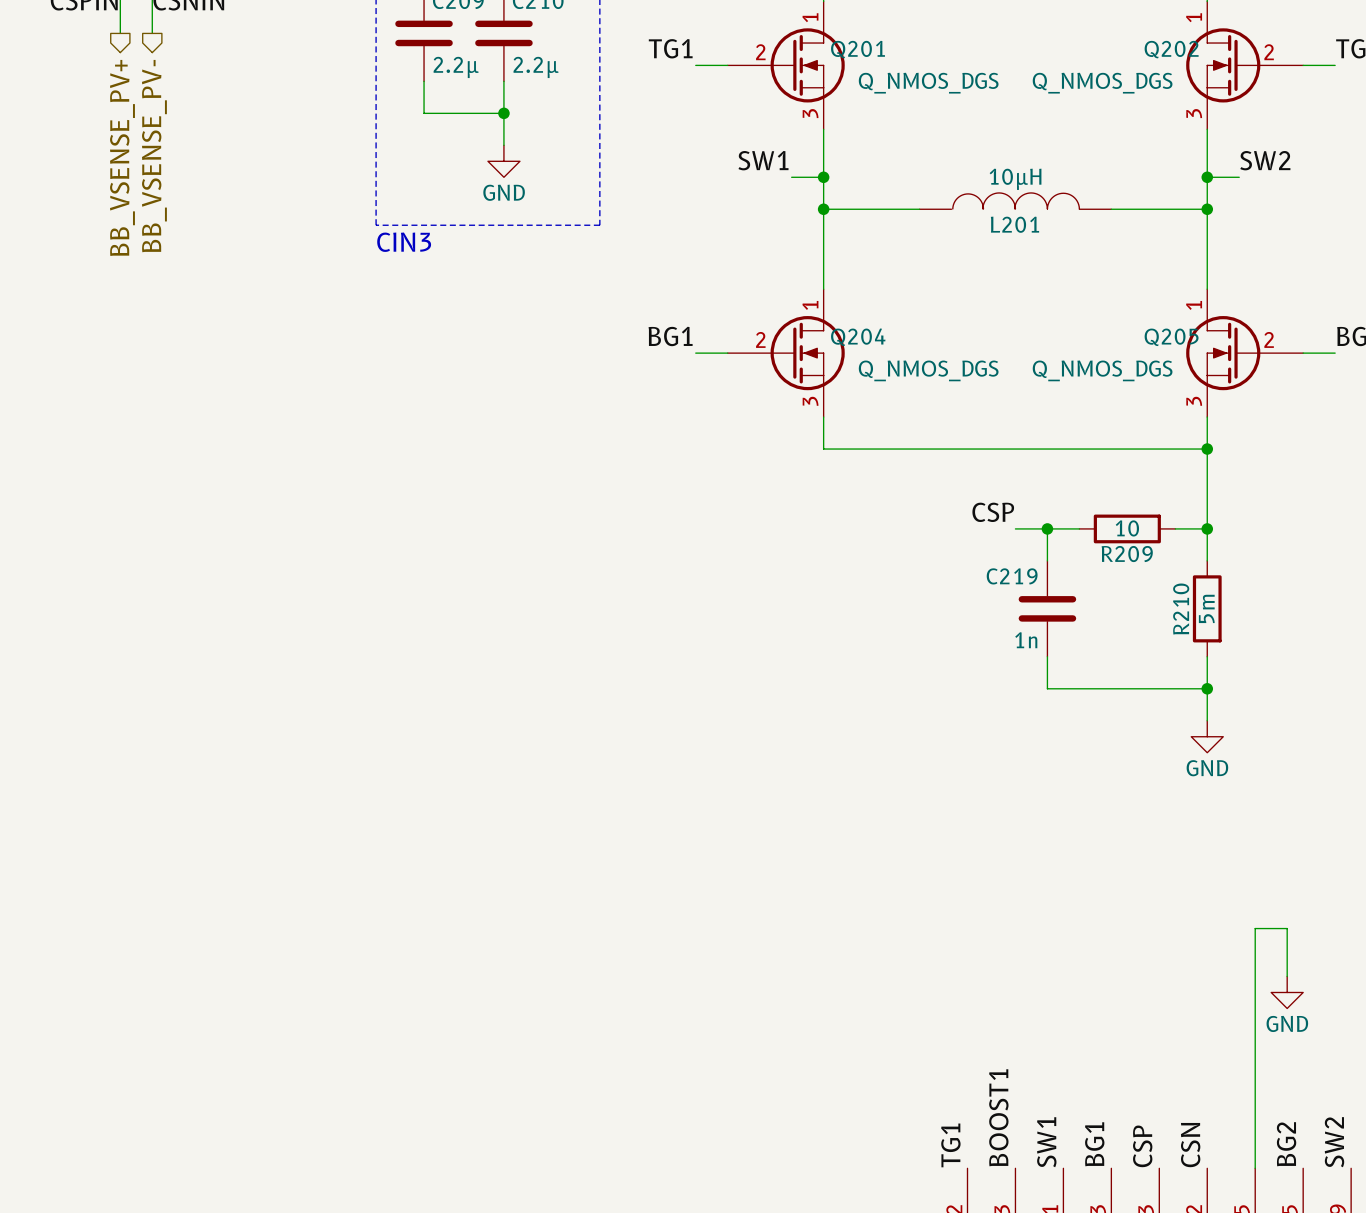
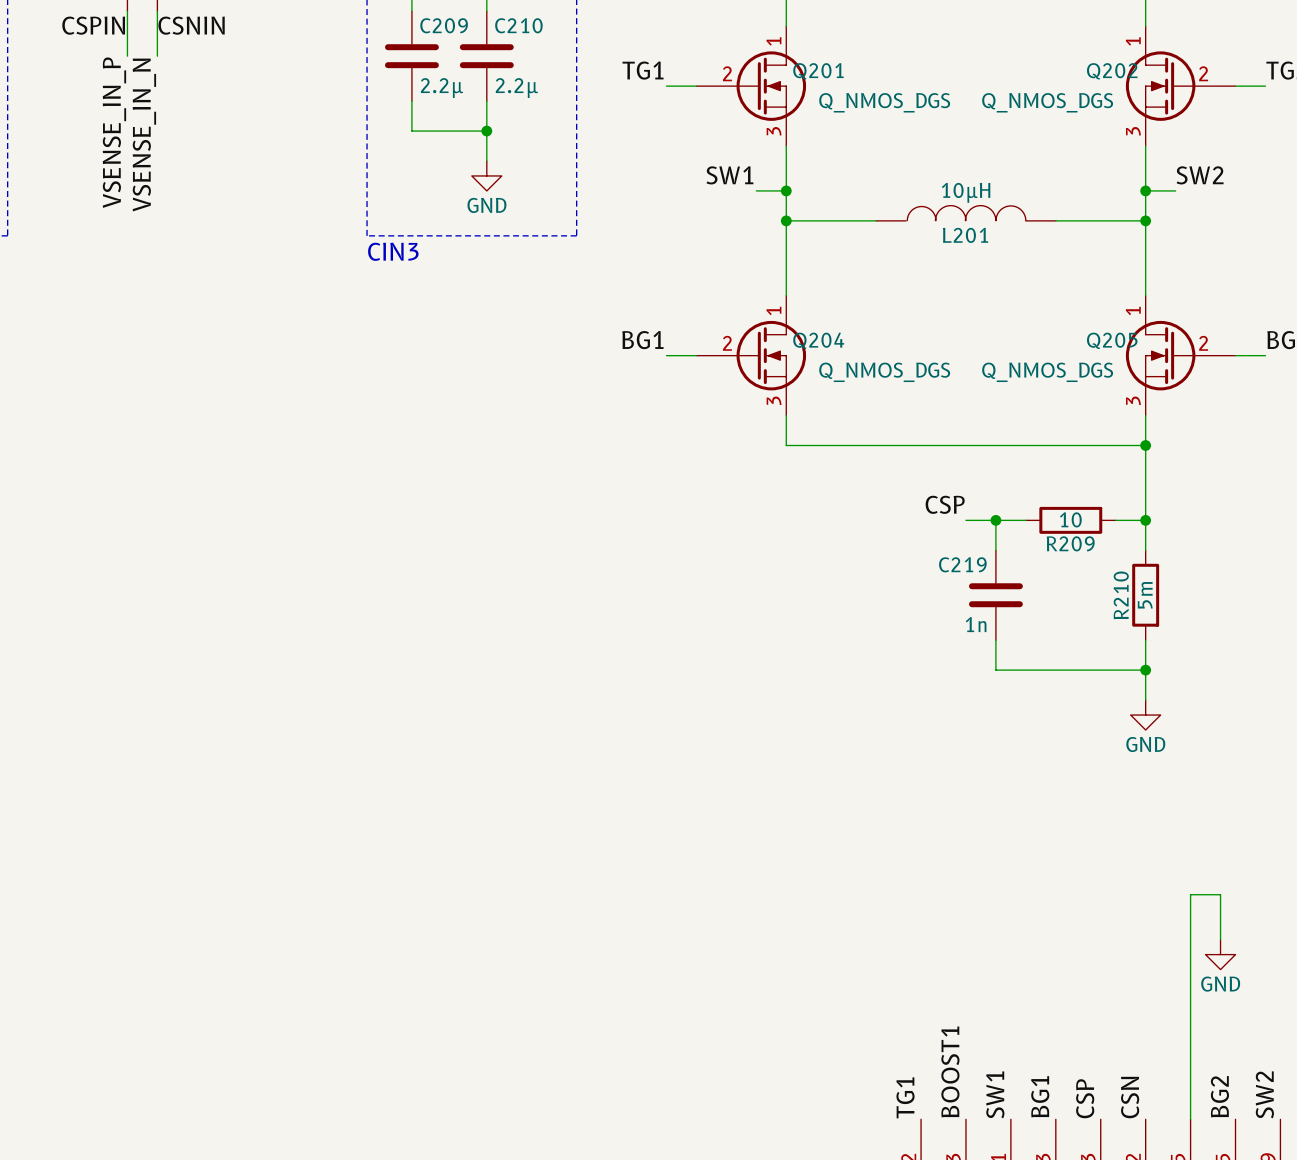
label: none -> VSENSE_IN_P (114, 132)
label: none -> VSENSE_IN_N (144, 135)
hierarchical label: BB_VSENSE_PV- (154, 156) -> none
hierarchical label: BB_VSENSE_PV+ (122, 157) -> none

